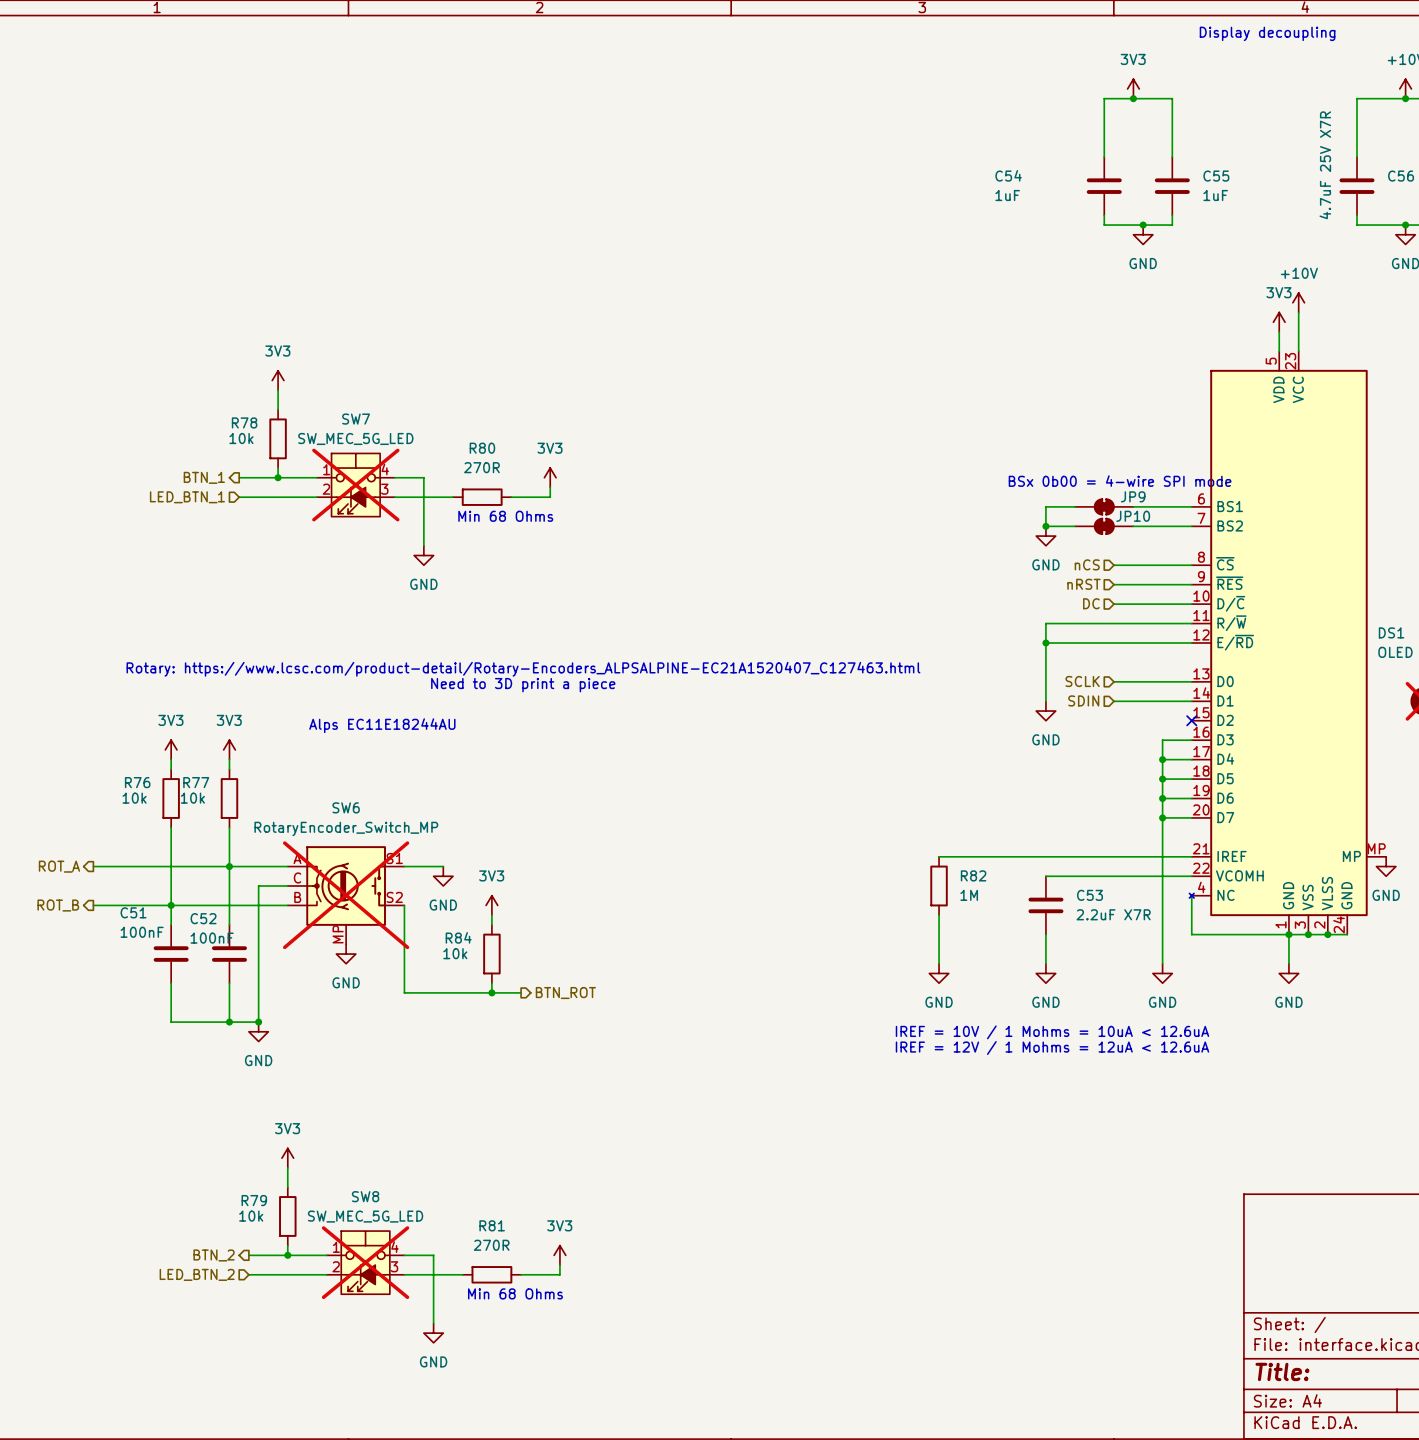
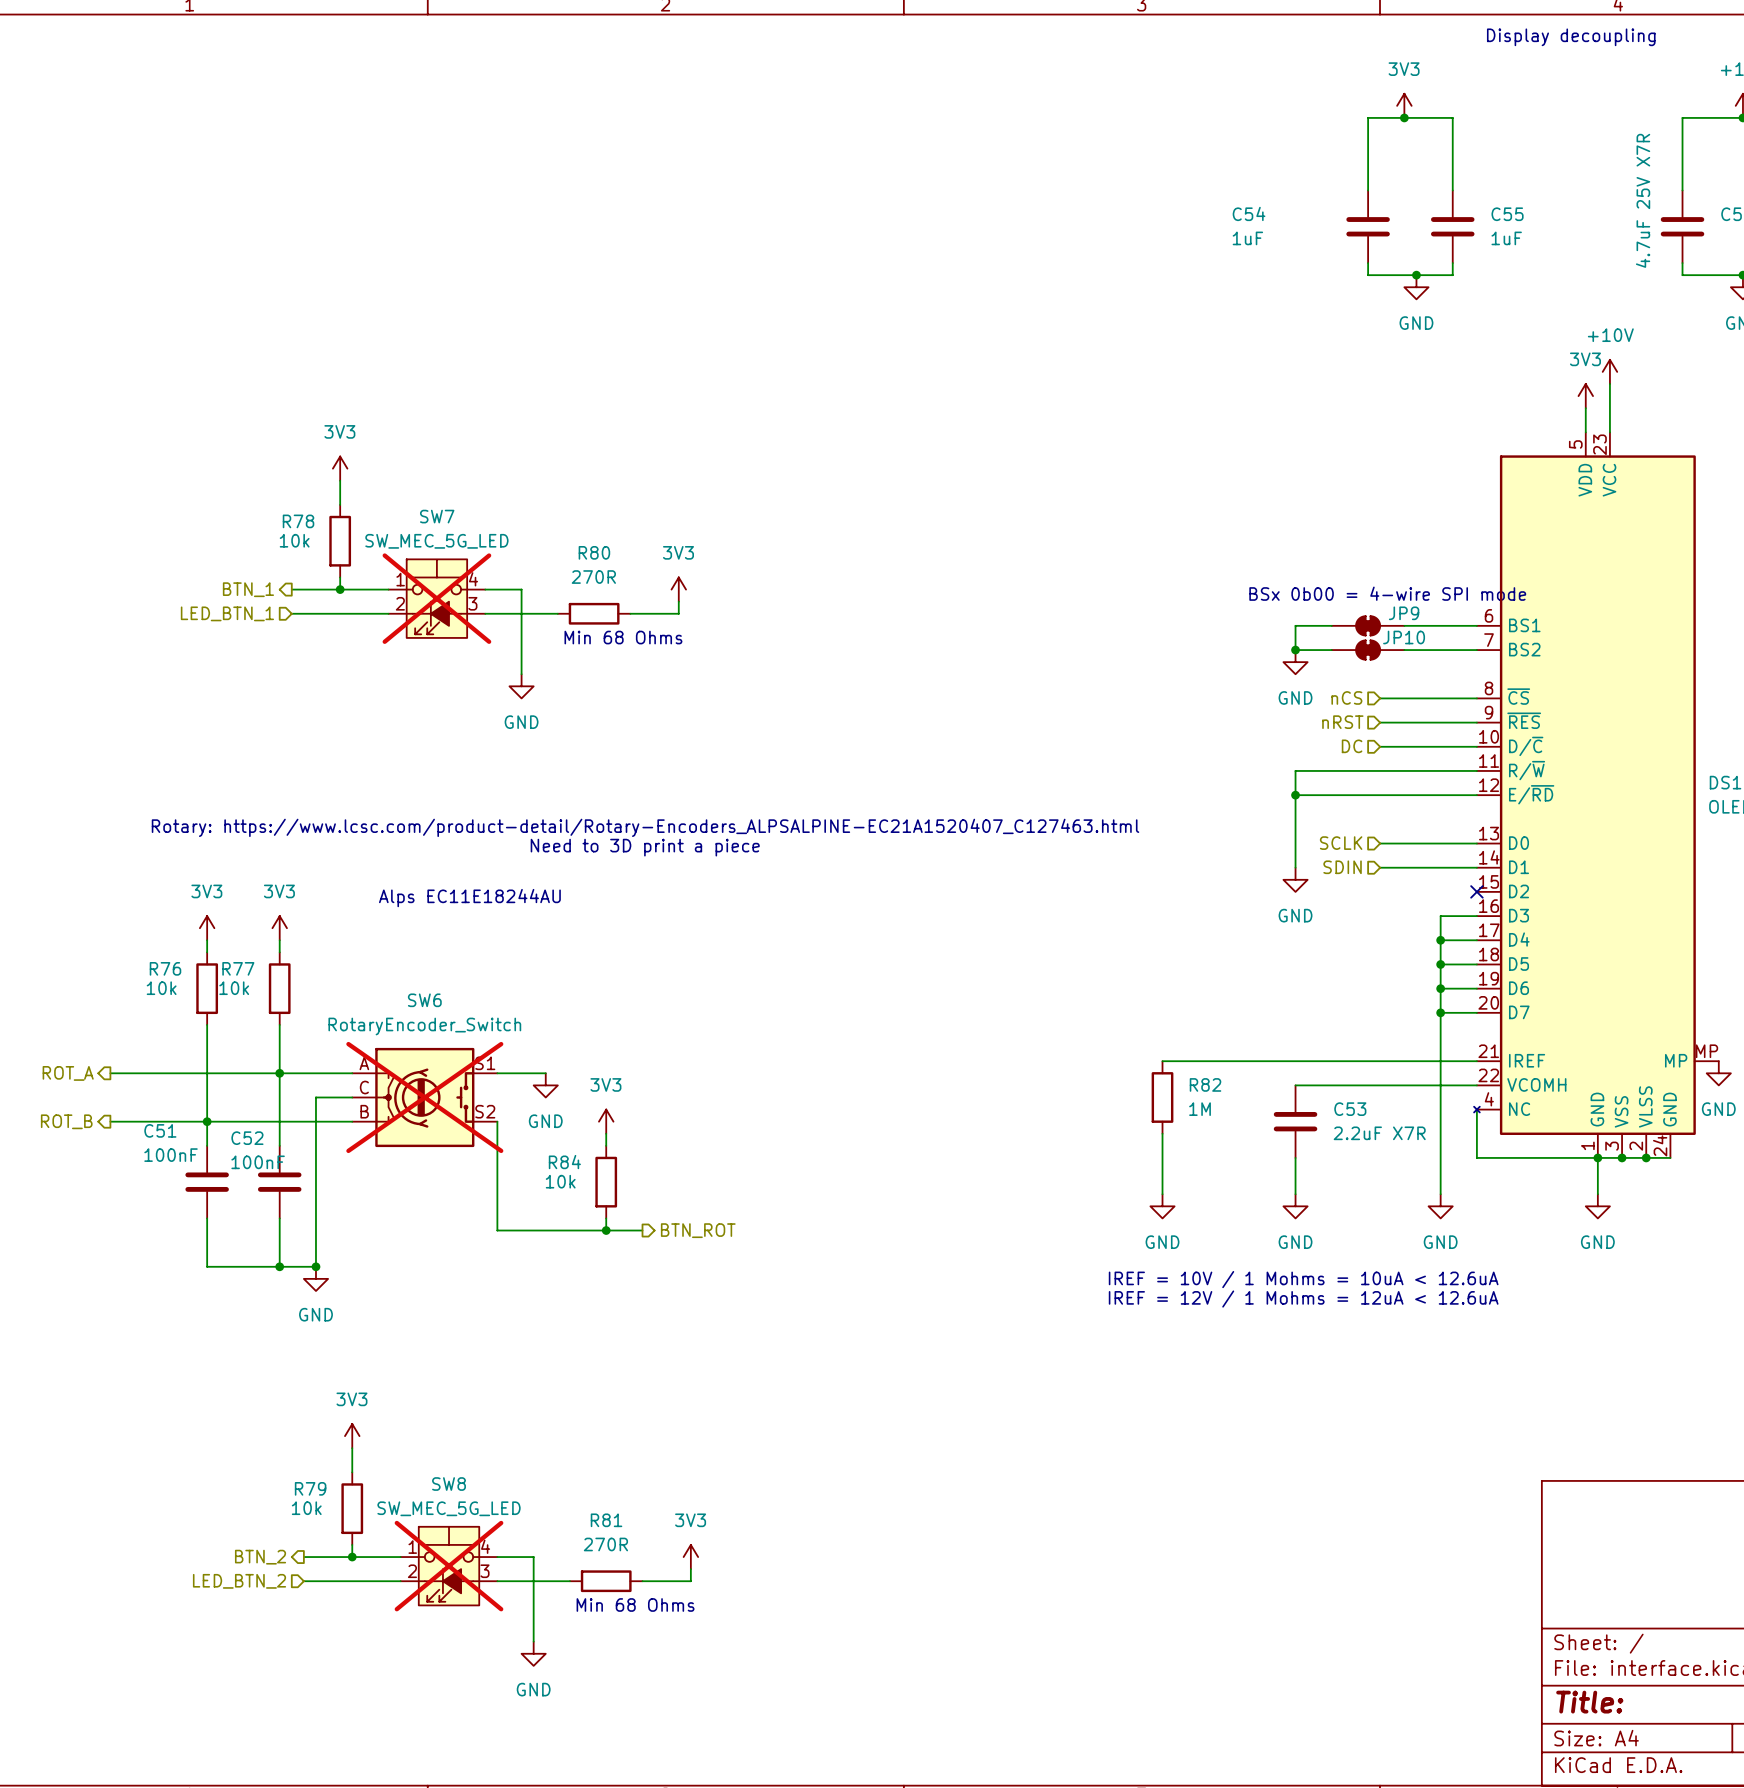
SW6 value: RotaryEncoder_Switch_MP (346, 828) -> RotaryEncoder_Switch (424, 1026)
SW6 symbol: [287, 846, 405, 945] -> [352, 1047, 498, 1148]
power symbol: GND (346, 954) -> none

